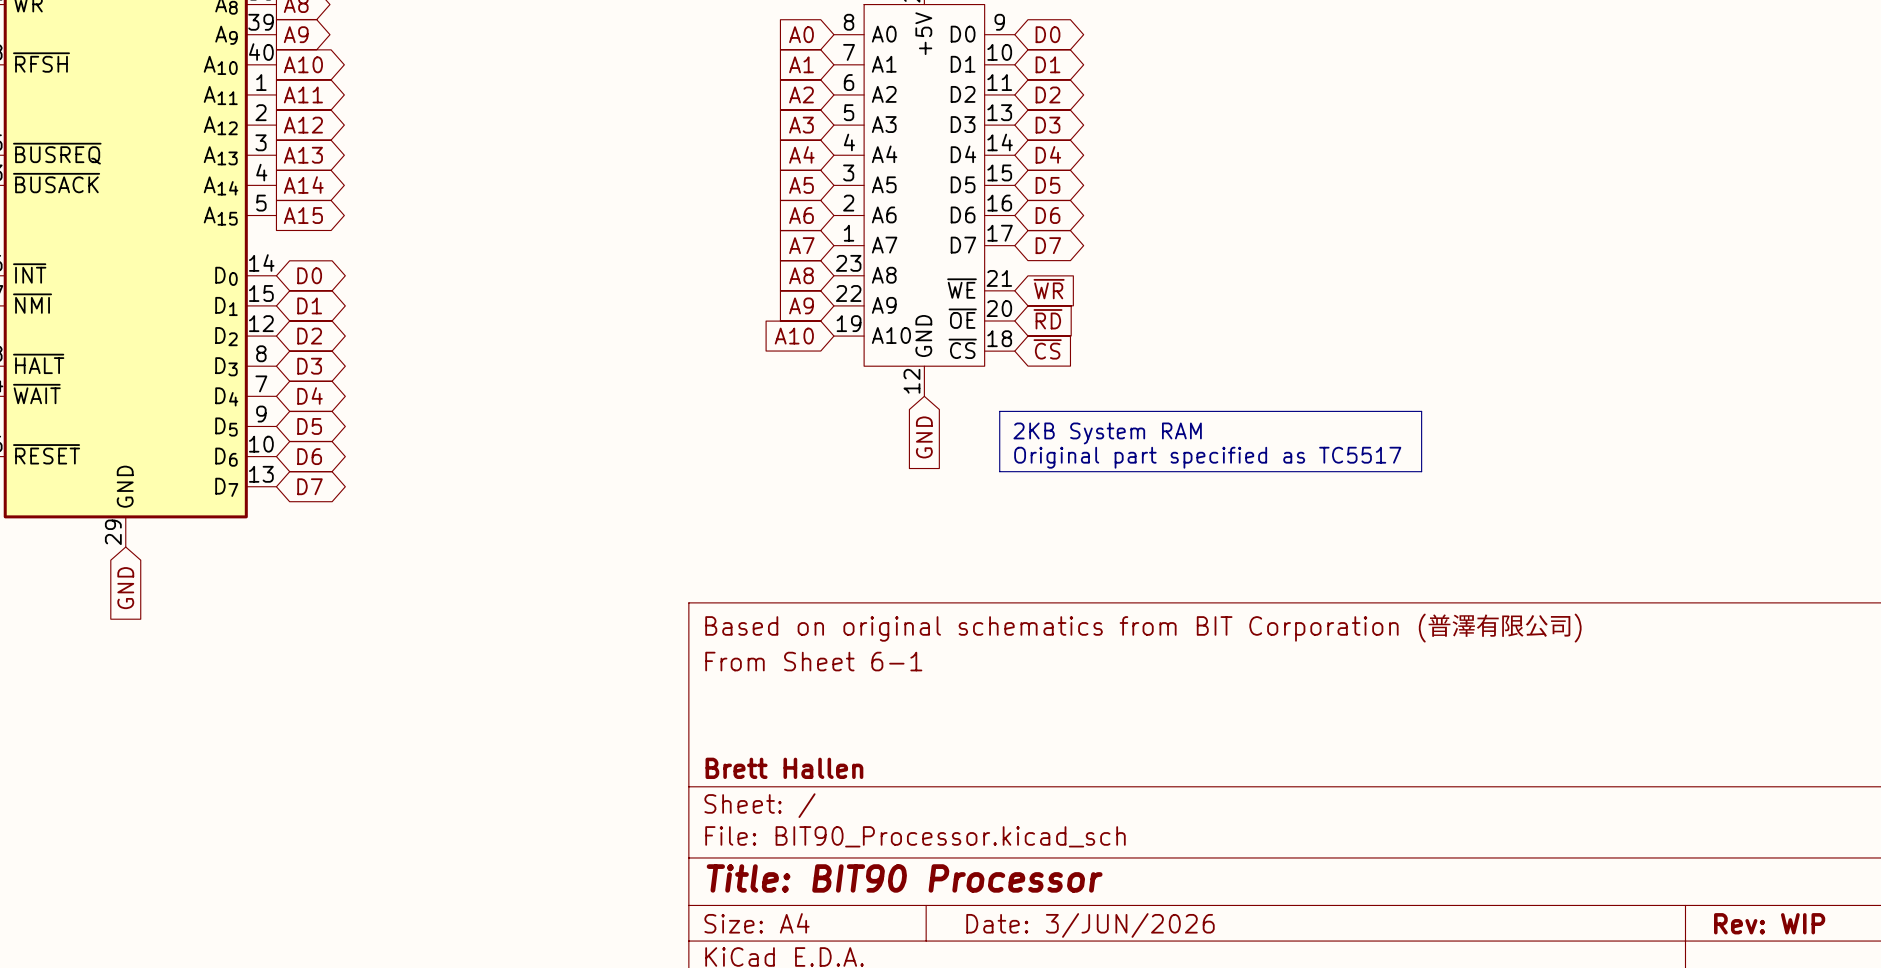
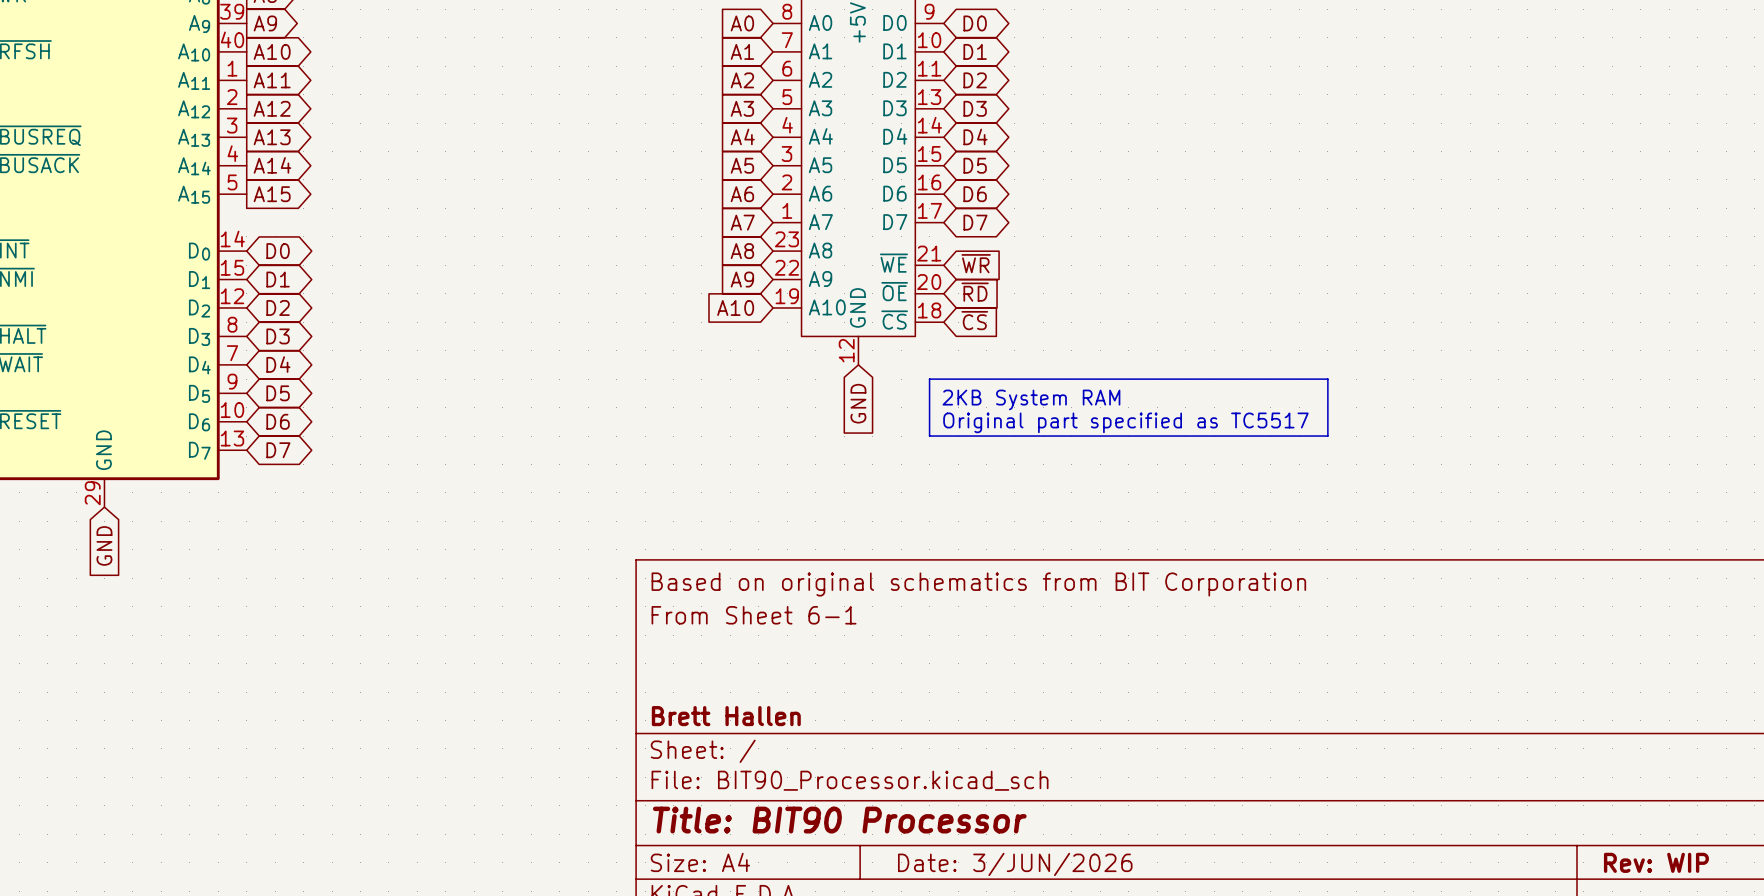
title block: Based on original schematics from BIT Corporation (普澤有限公司) (1143, 628) -> Based on original schematics from BIT Corporation (978, 584)

